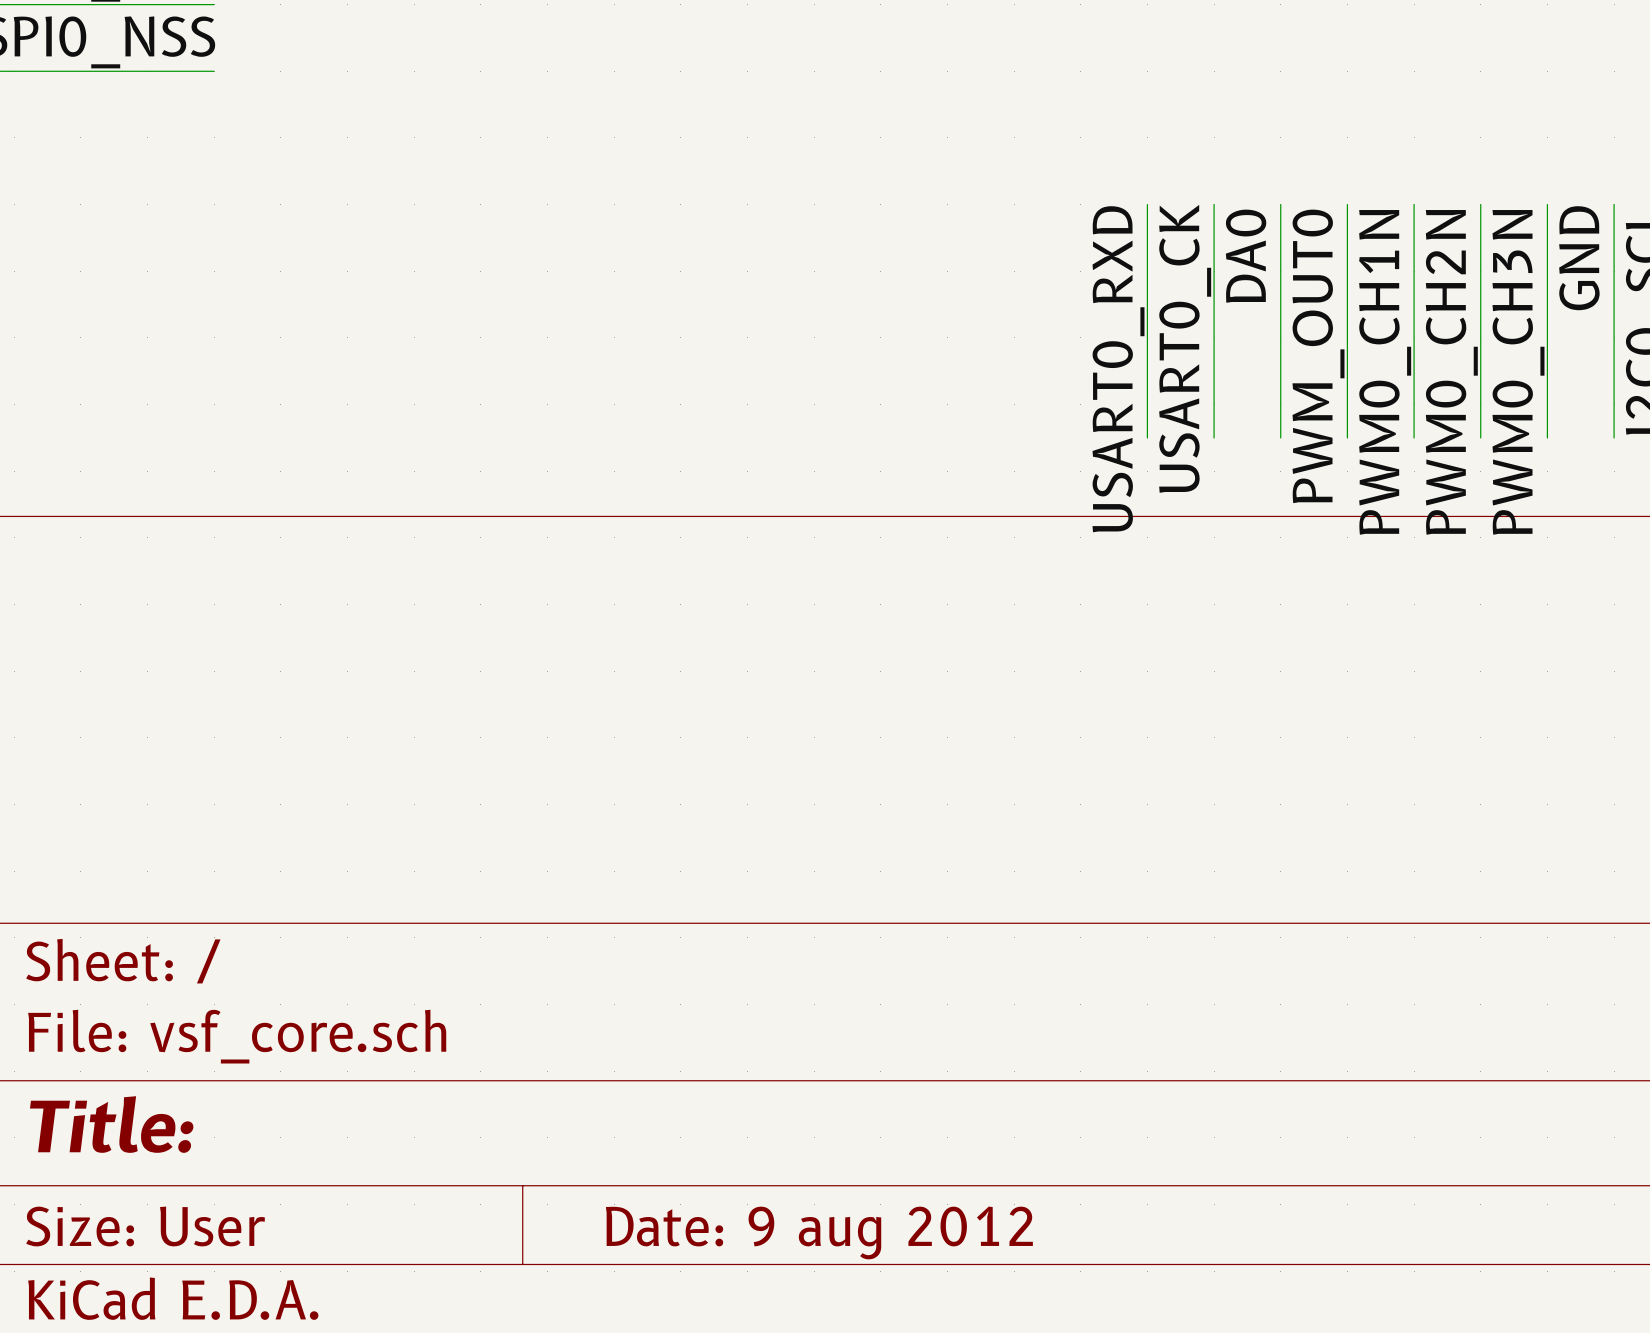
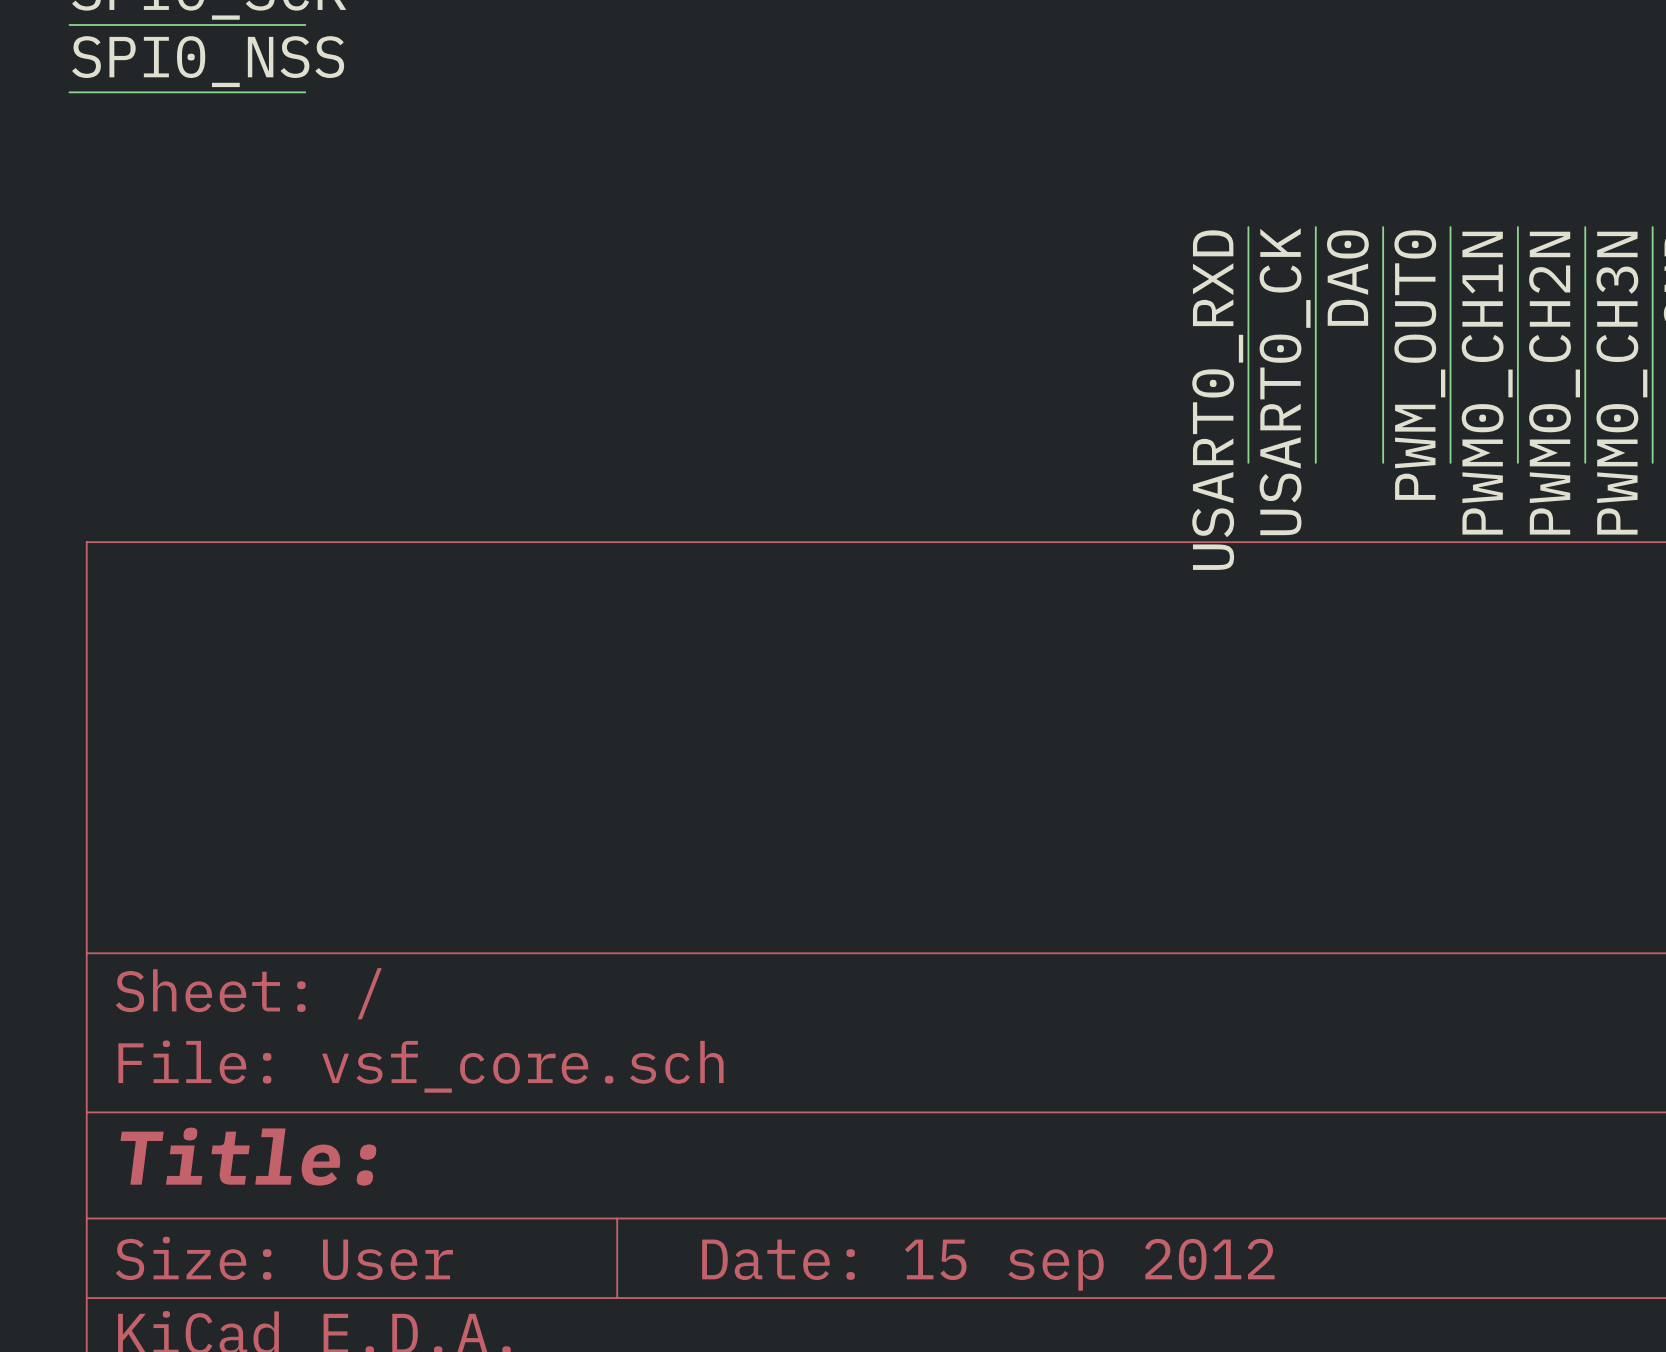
title block: Date: 9 aug 2012 (819, 1232) -> Date: 15 sep 2012 (988, 1264)

